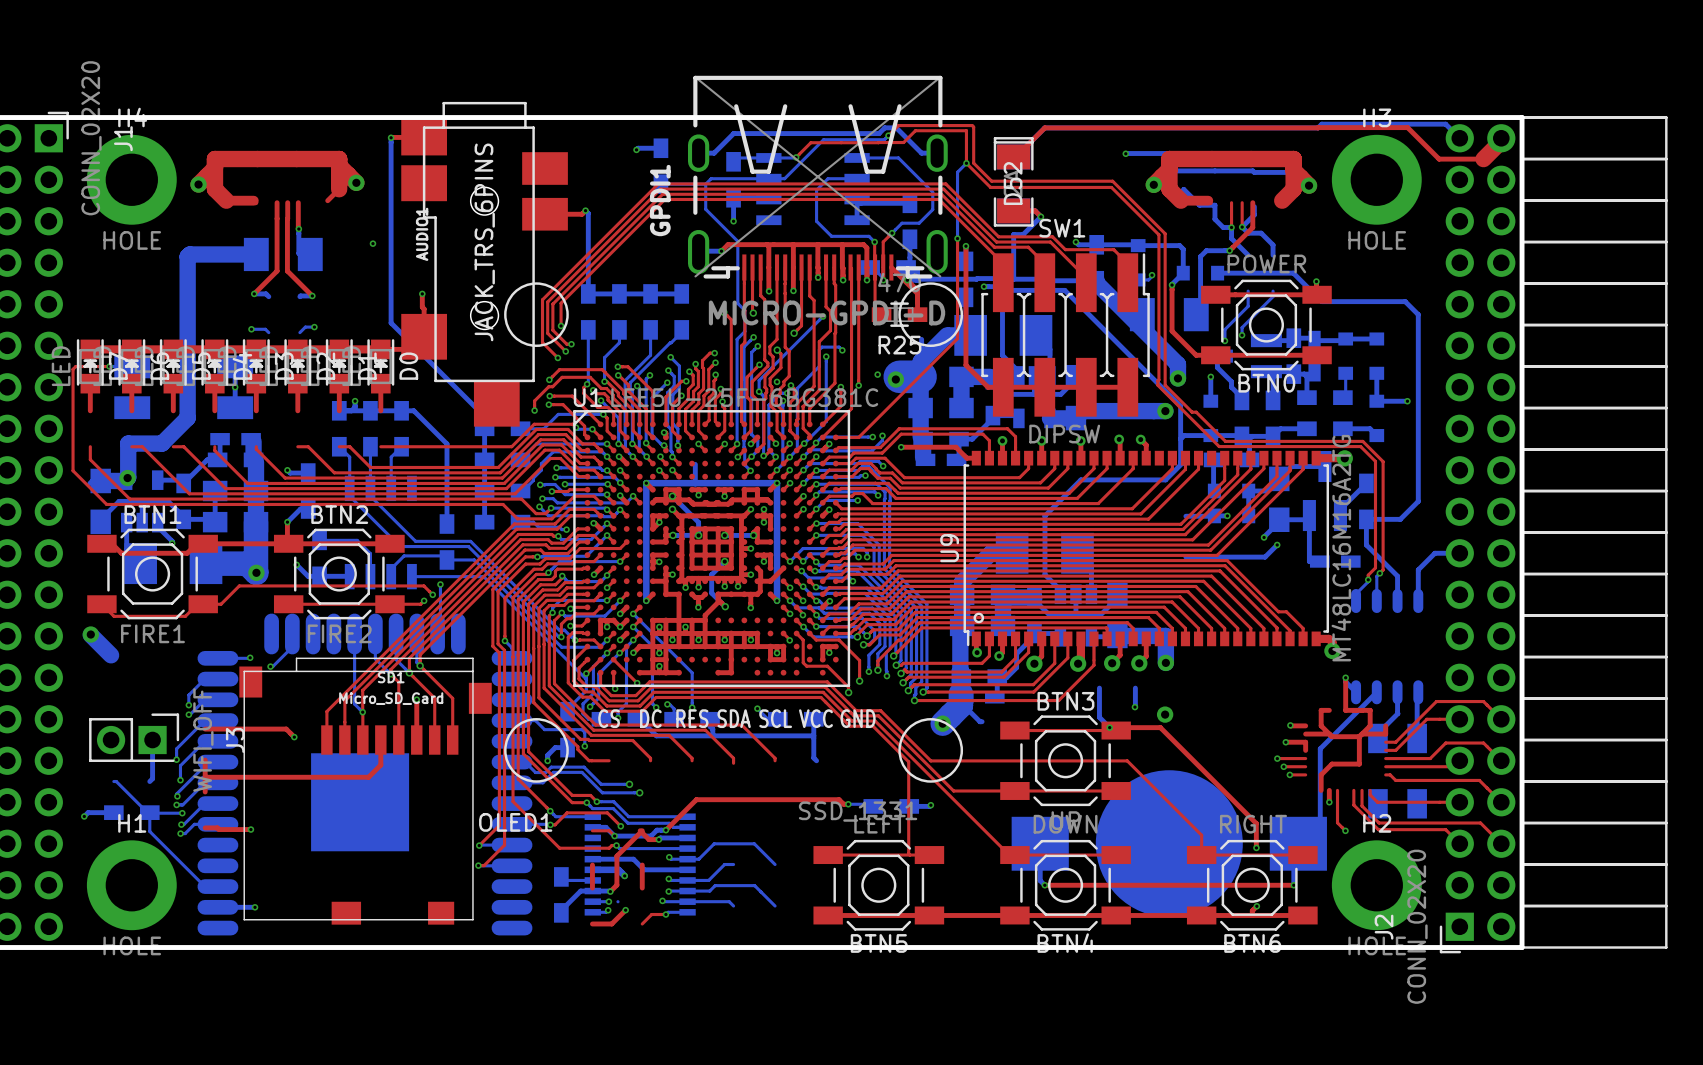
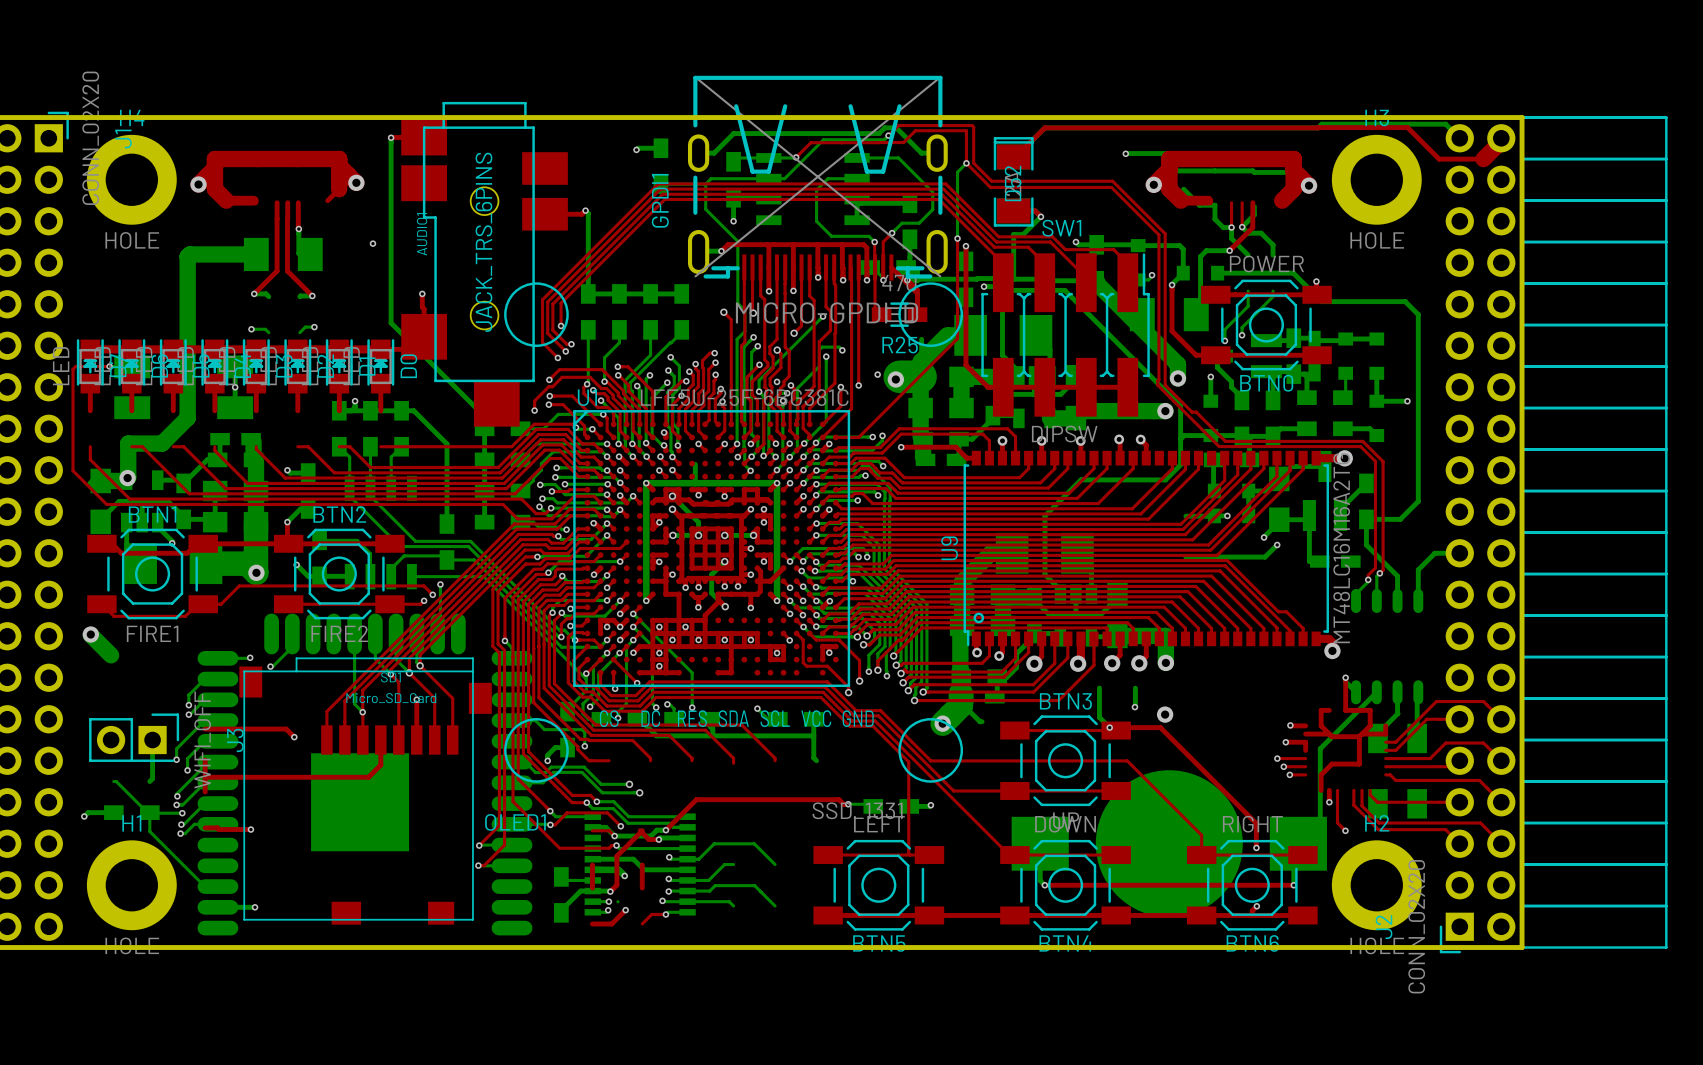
bottom track: (187, 758) (180, 765) (180, 780) -> (187, 758) (187, 770)
via position: (180, 780) -> (187, 770)

